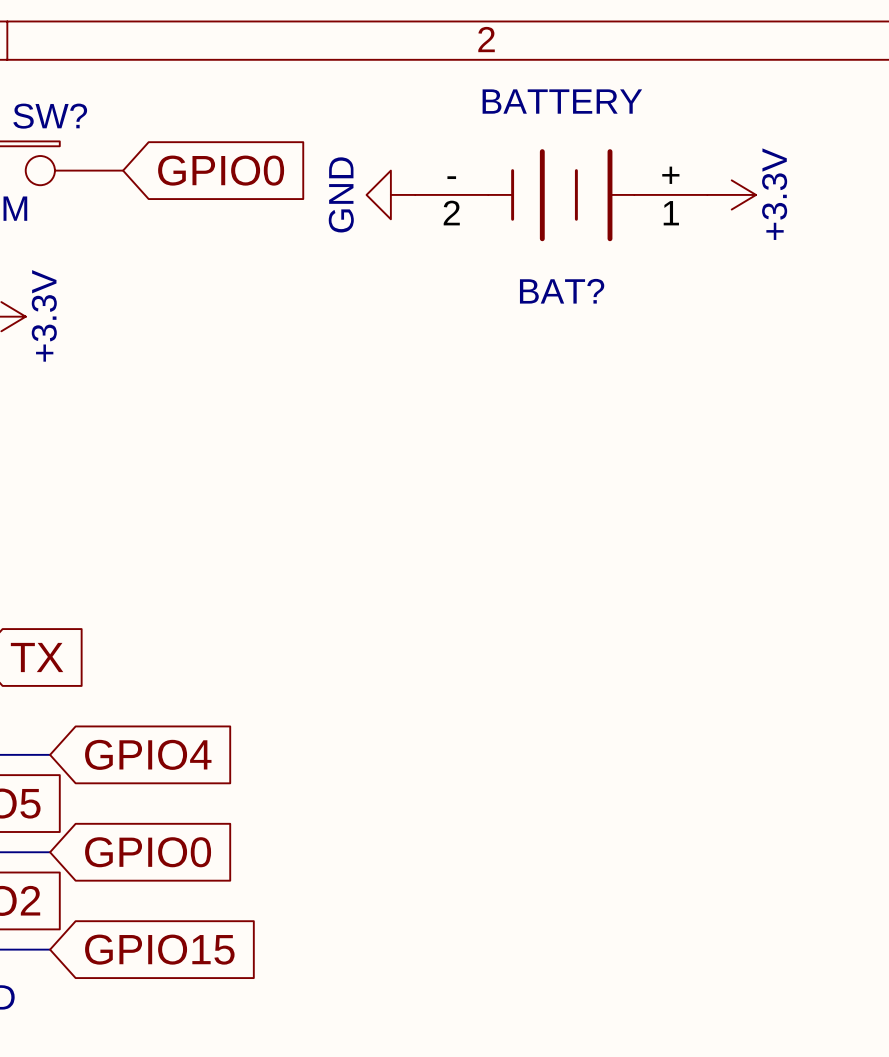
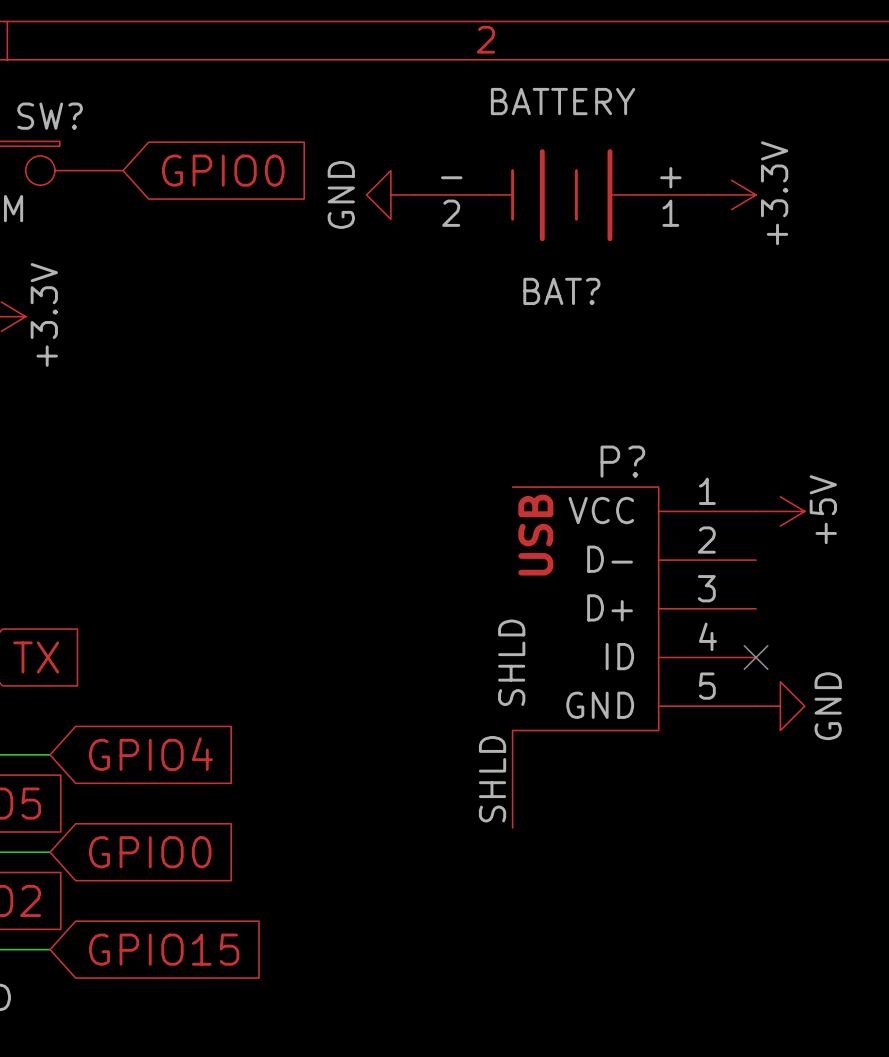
power symbol: none -> +5V (780, 511)
P?: none -> (634, 657)
no-connect mark: none -> (756, 657)
power symbol: none -> GND (780, 706)

